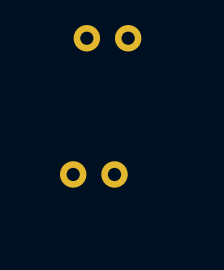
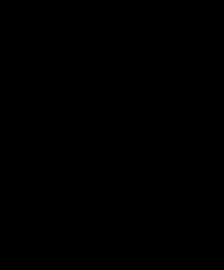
part: (107, 38) -> none
part: (93, 174) -> none

